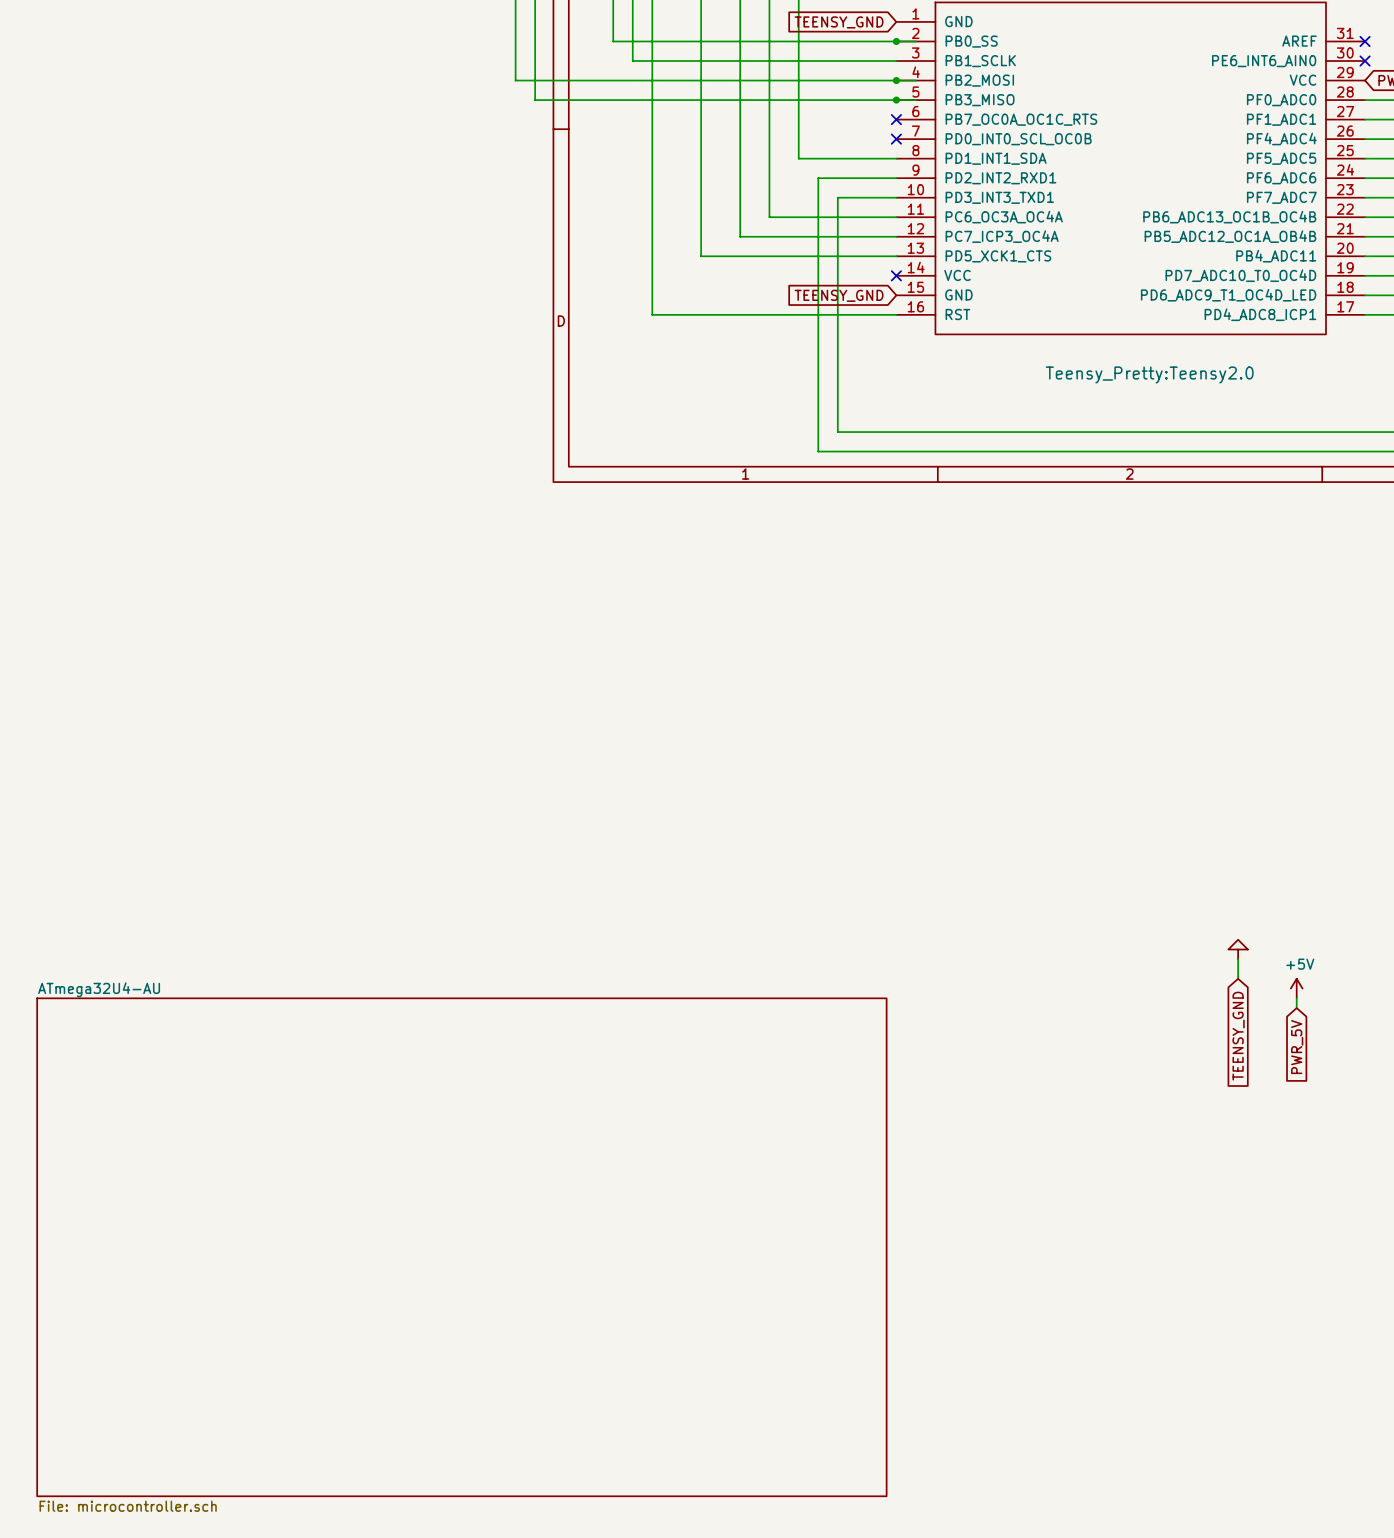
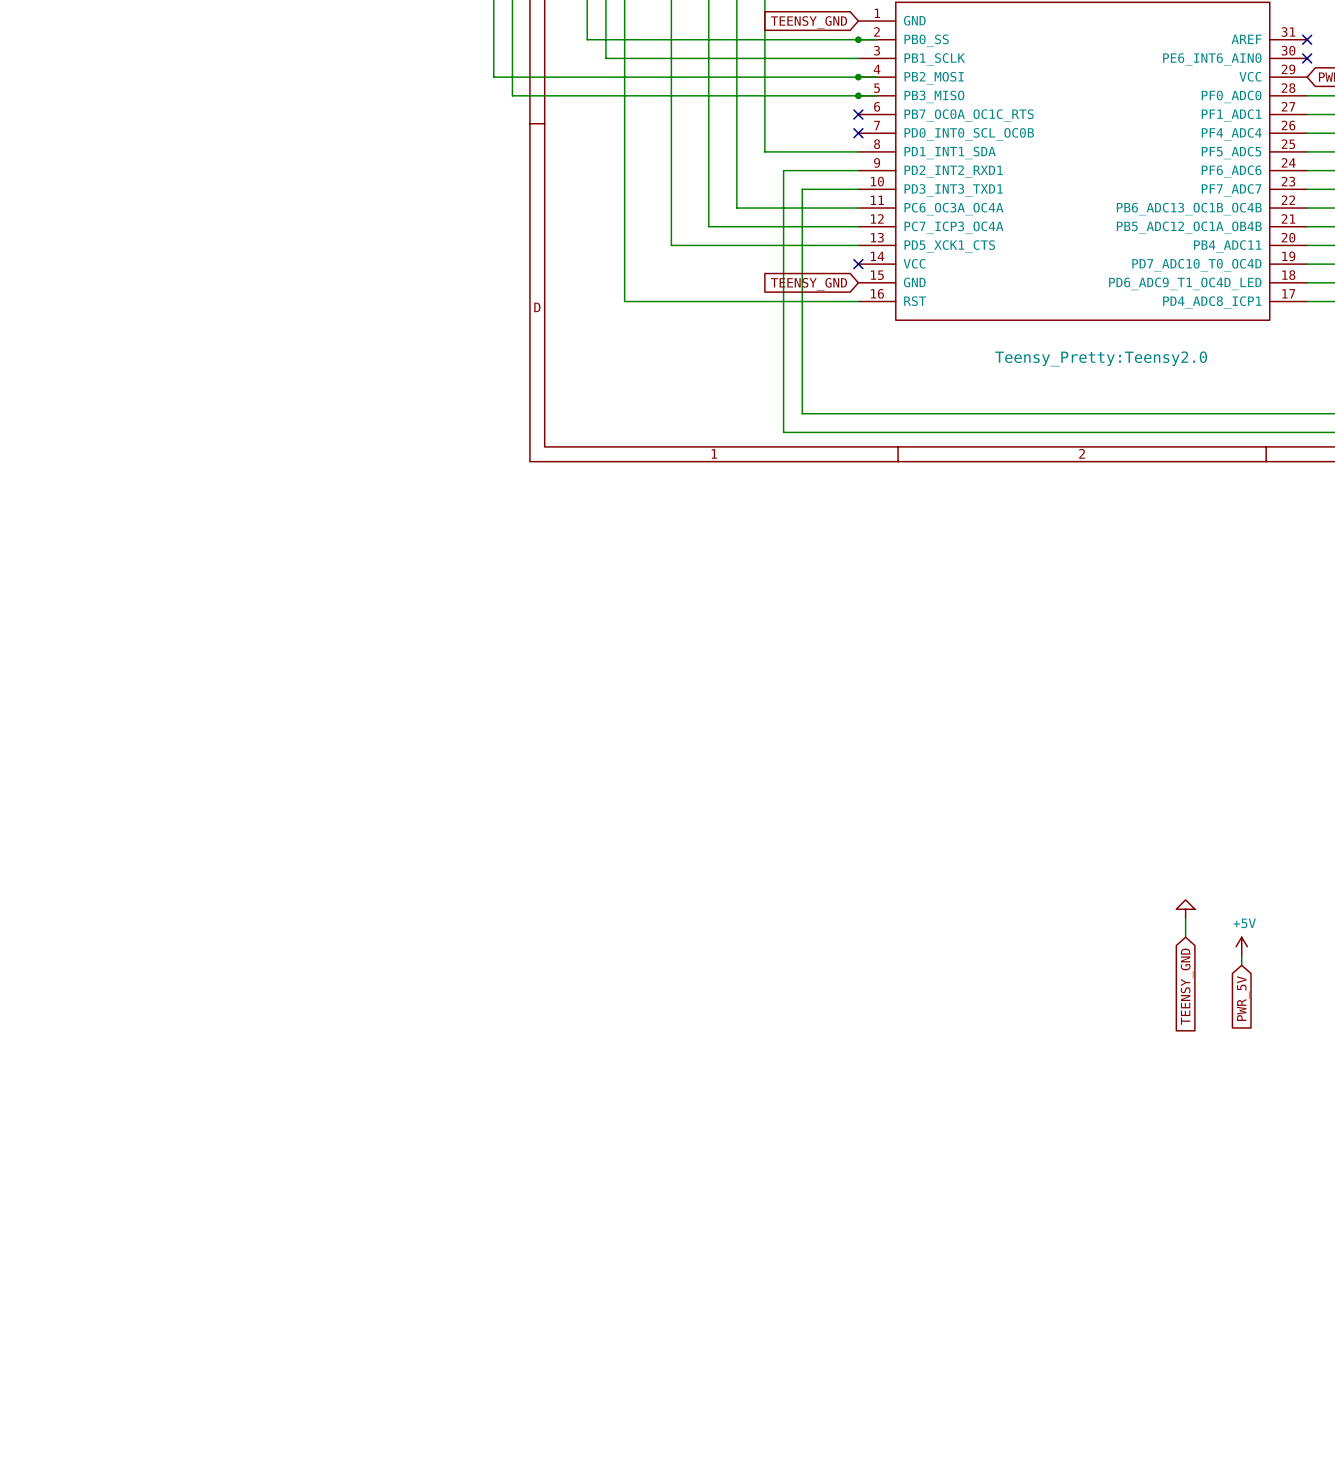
sheet ATmega32U4-AU: File: microcontroller.sch (461, 1247) -> none

